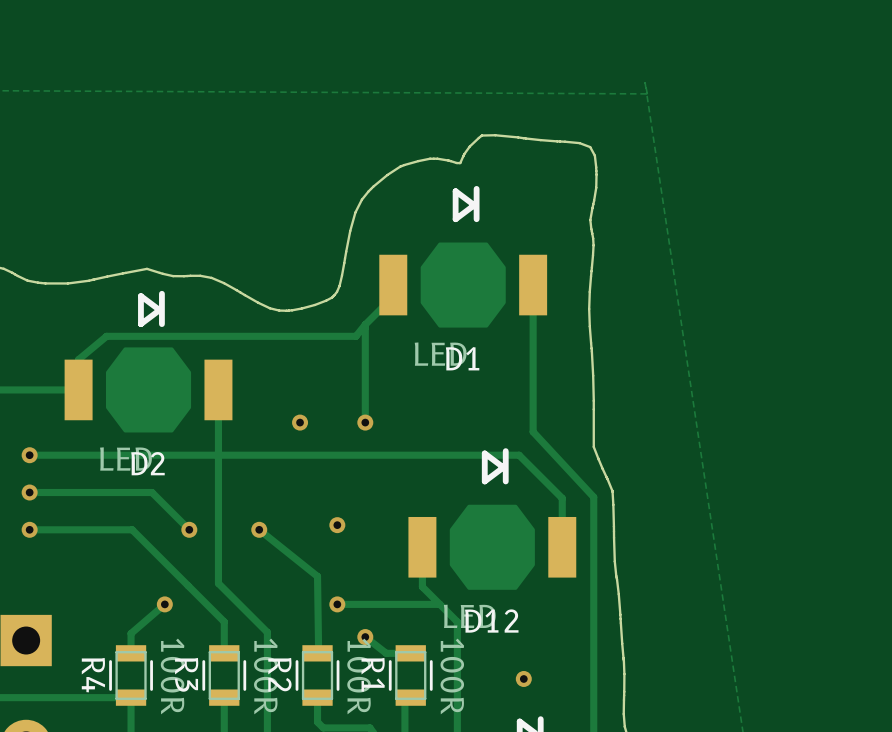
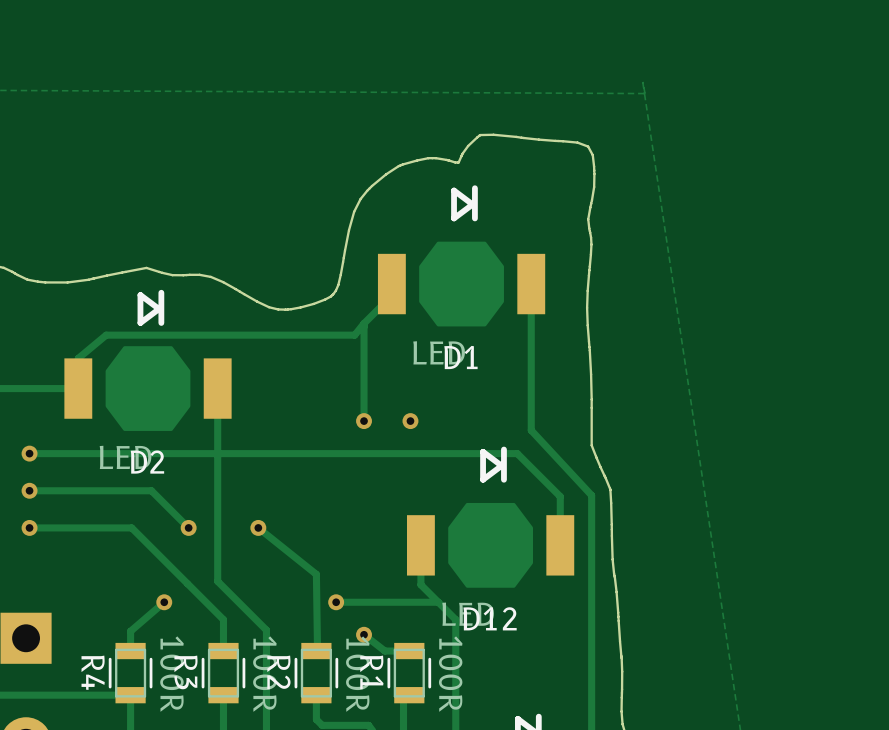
via: (300, 422) -> none
via: none -> (410, 421)
via: (337, 525) -> none
via: (523, 678) -> none

